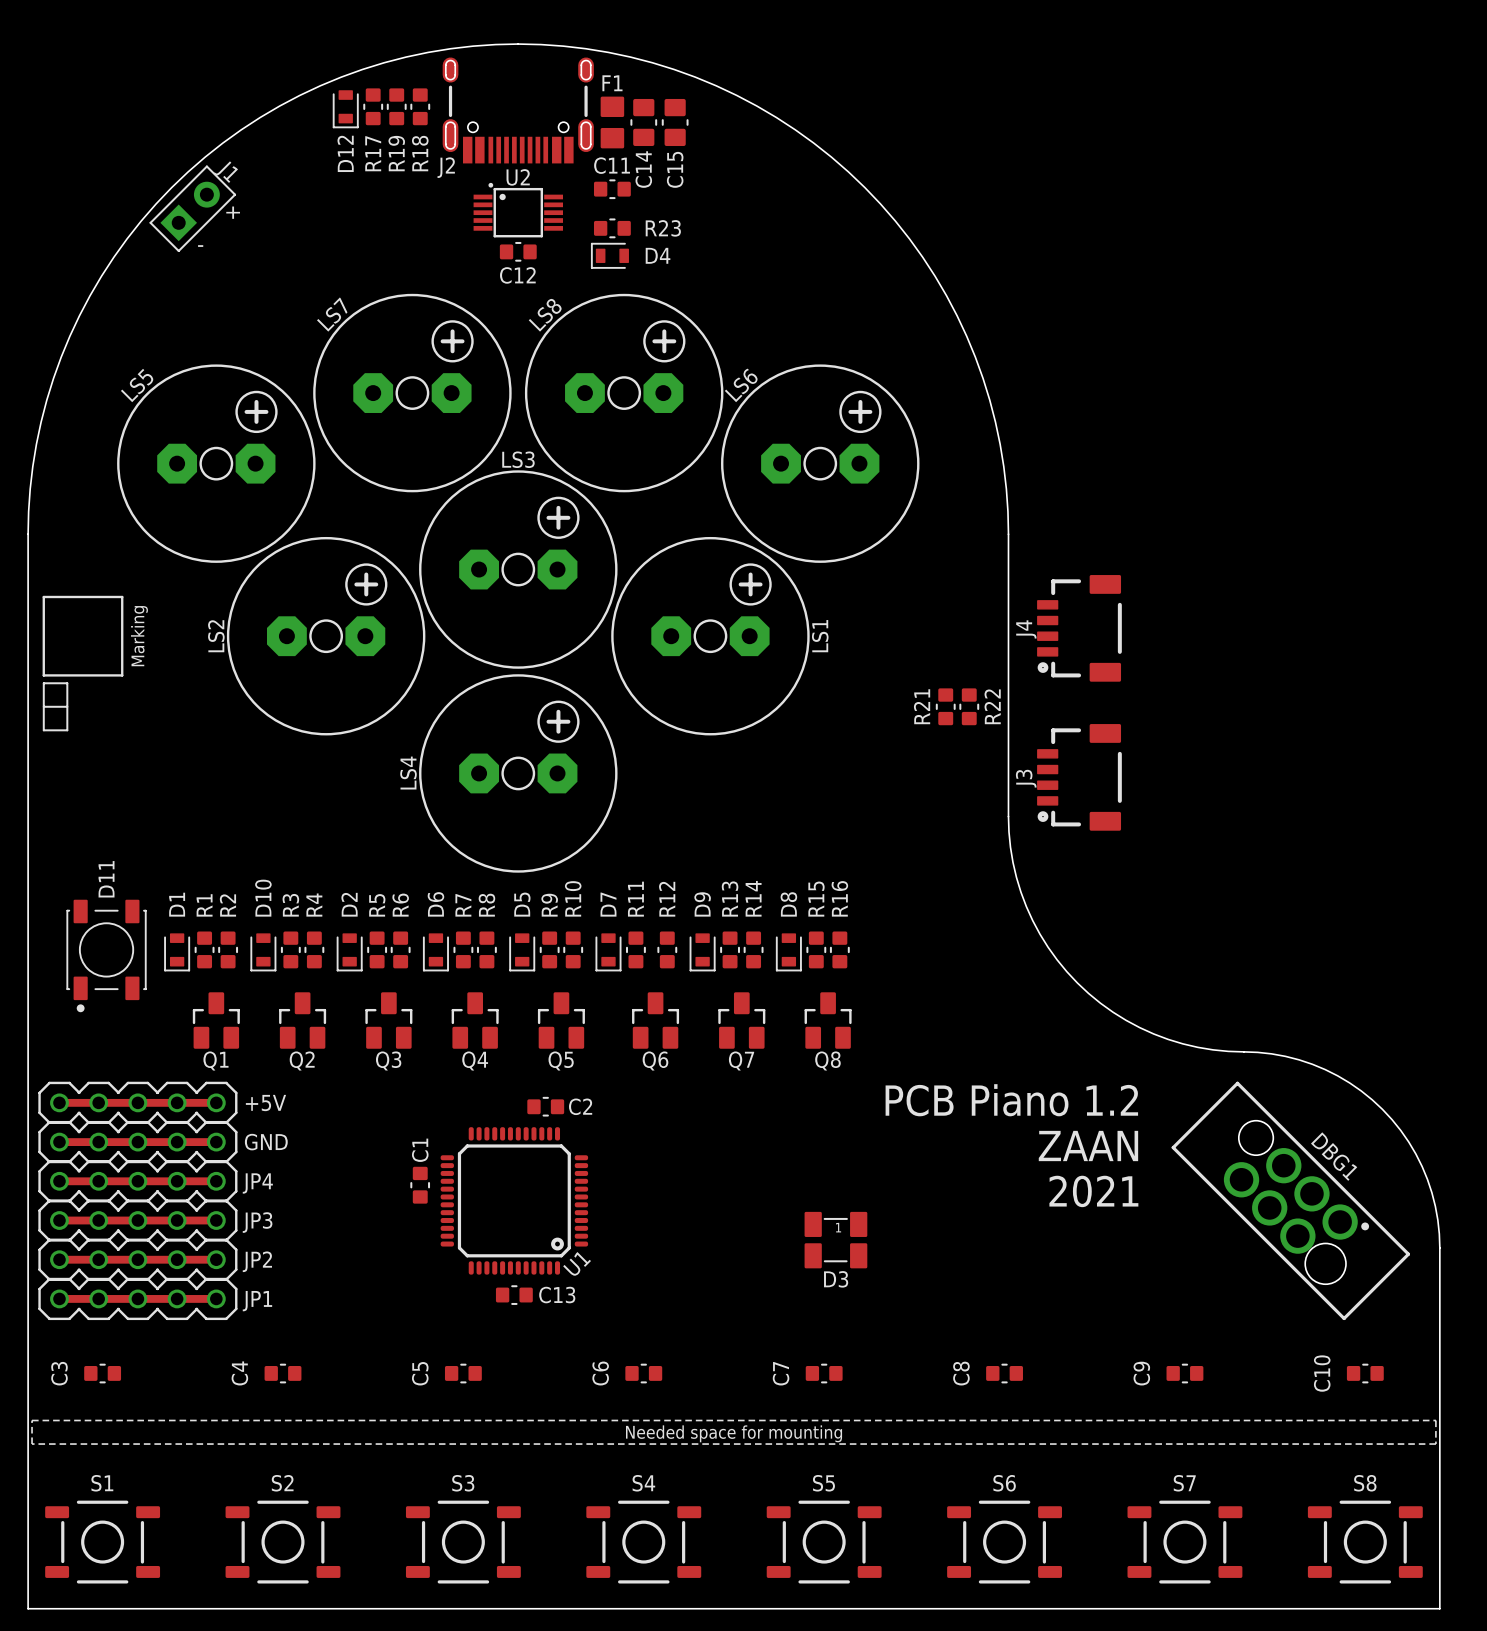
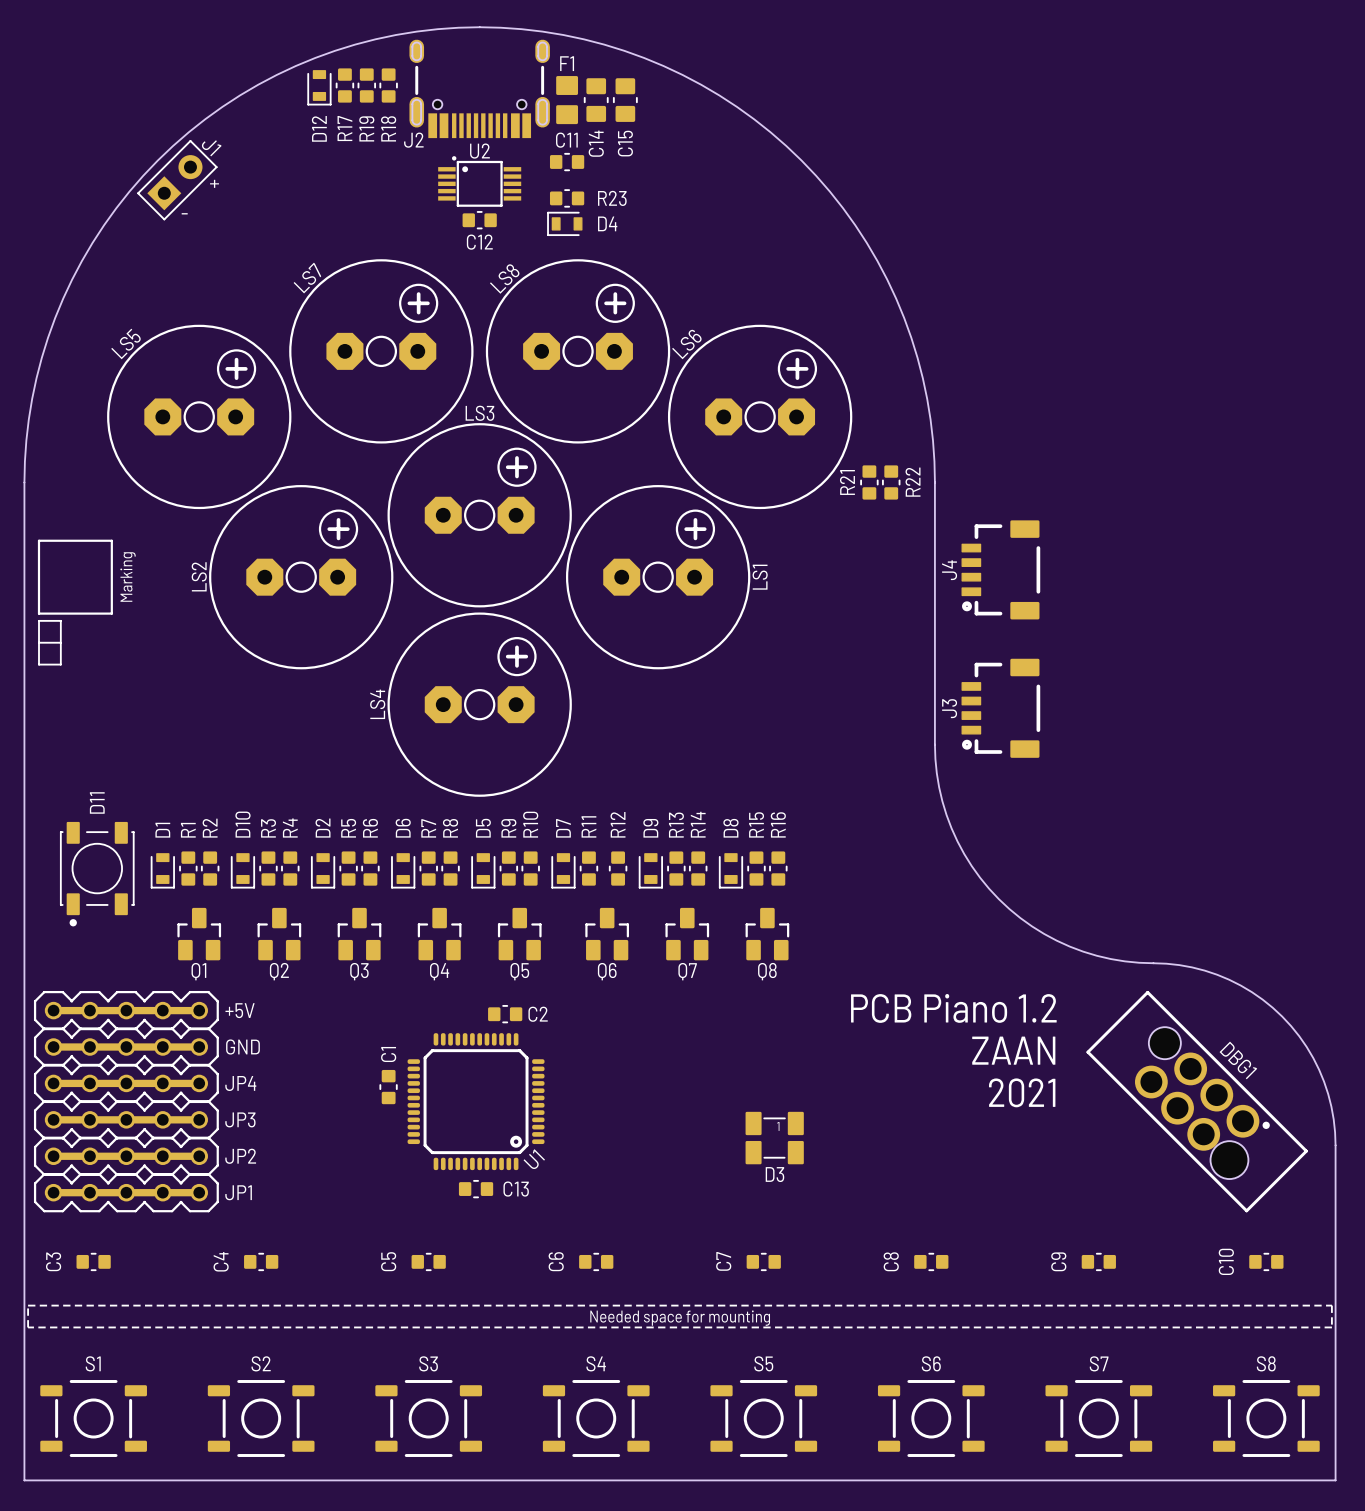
R21 position: (945, 706) -> (869, 482)
R22 position: (969, 706) -> (891, 482)

